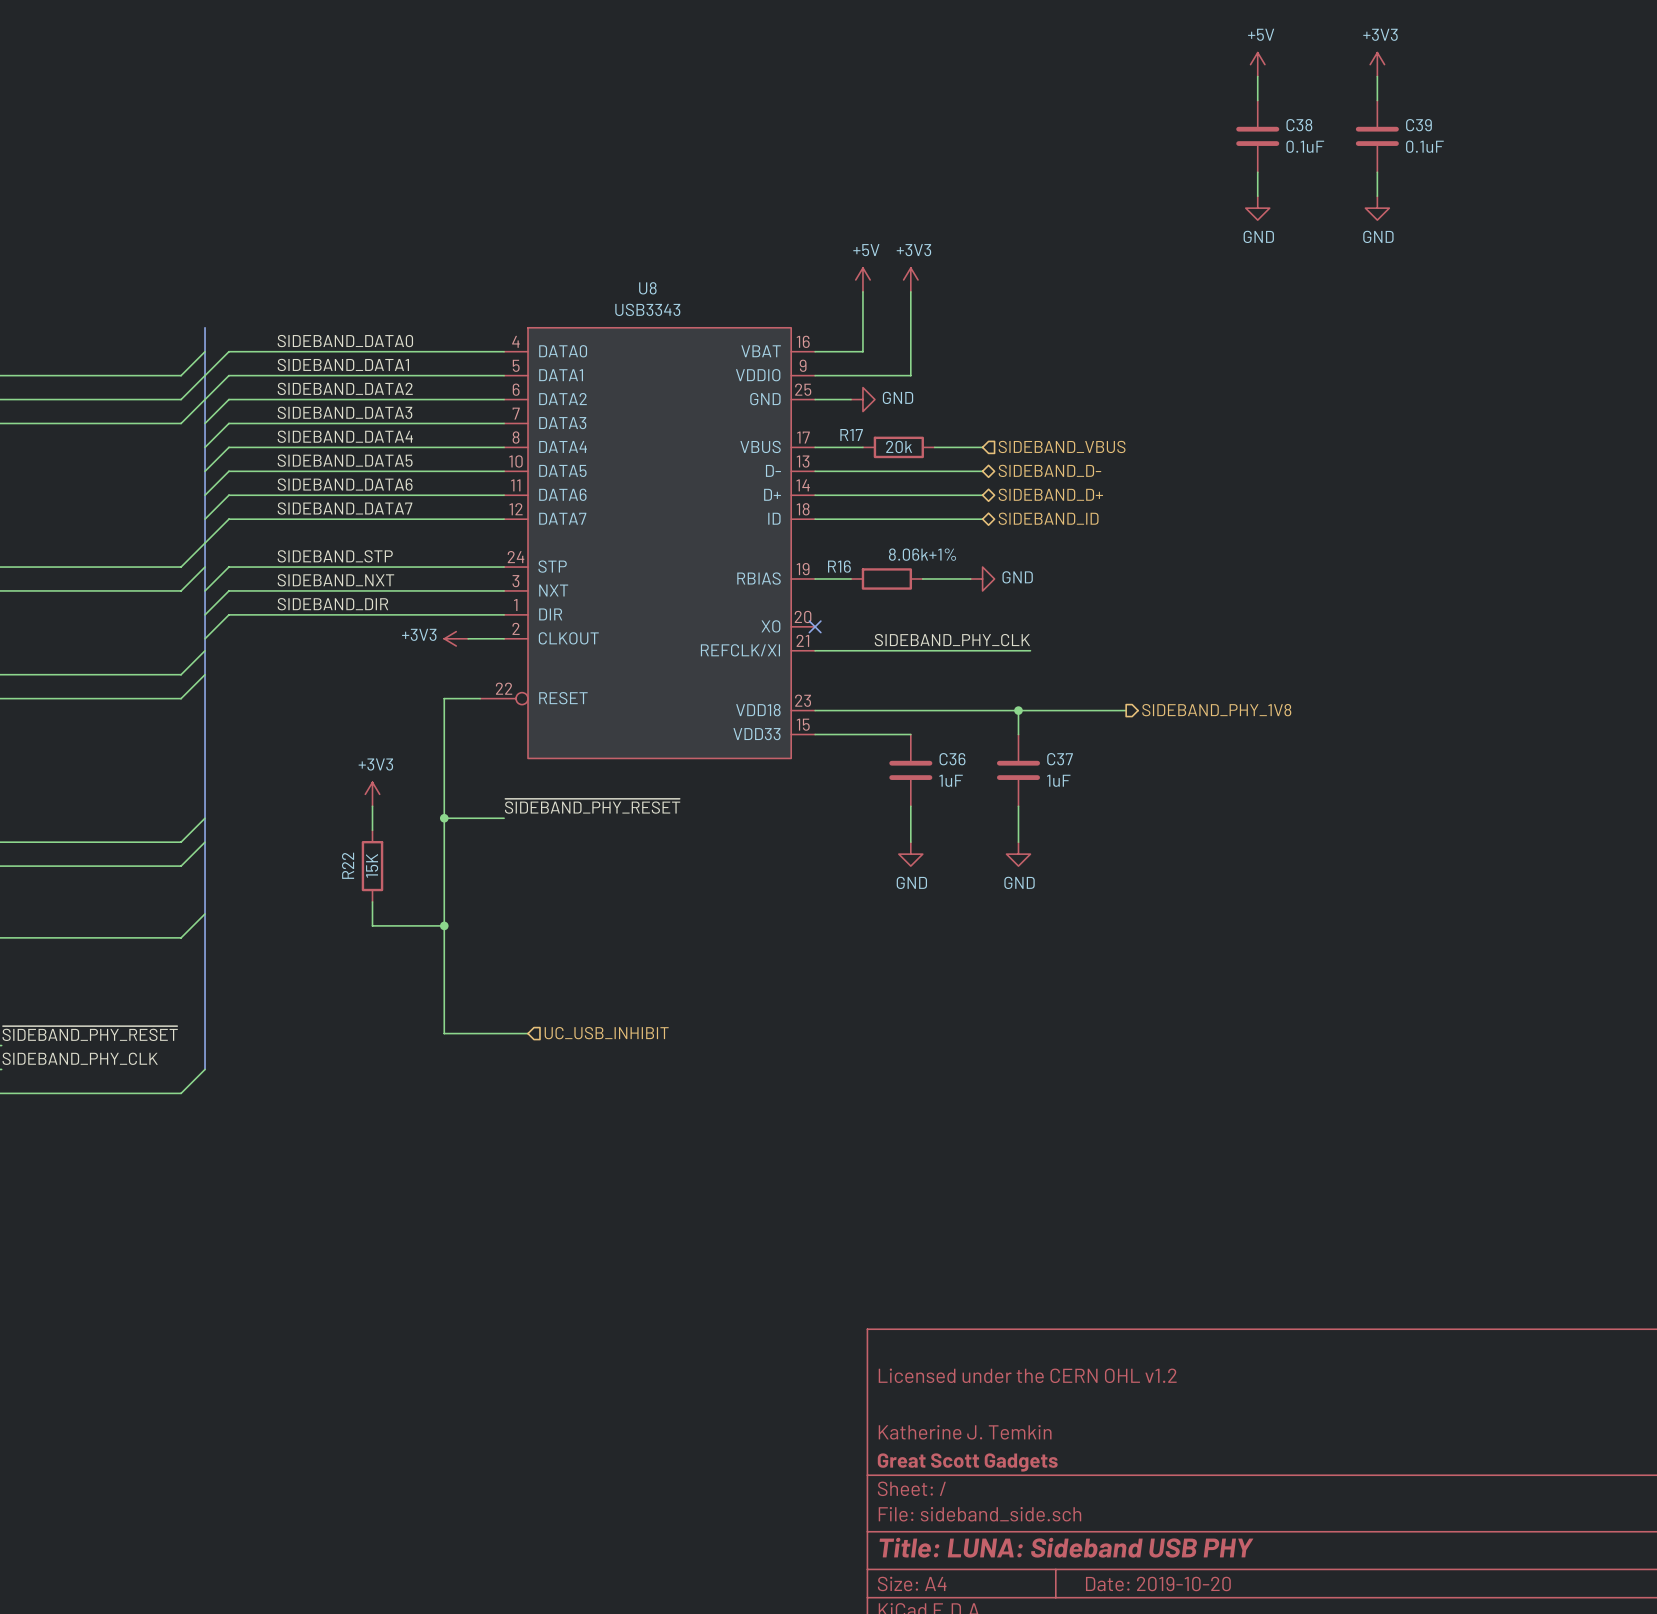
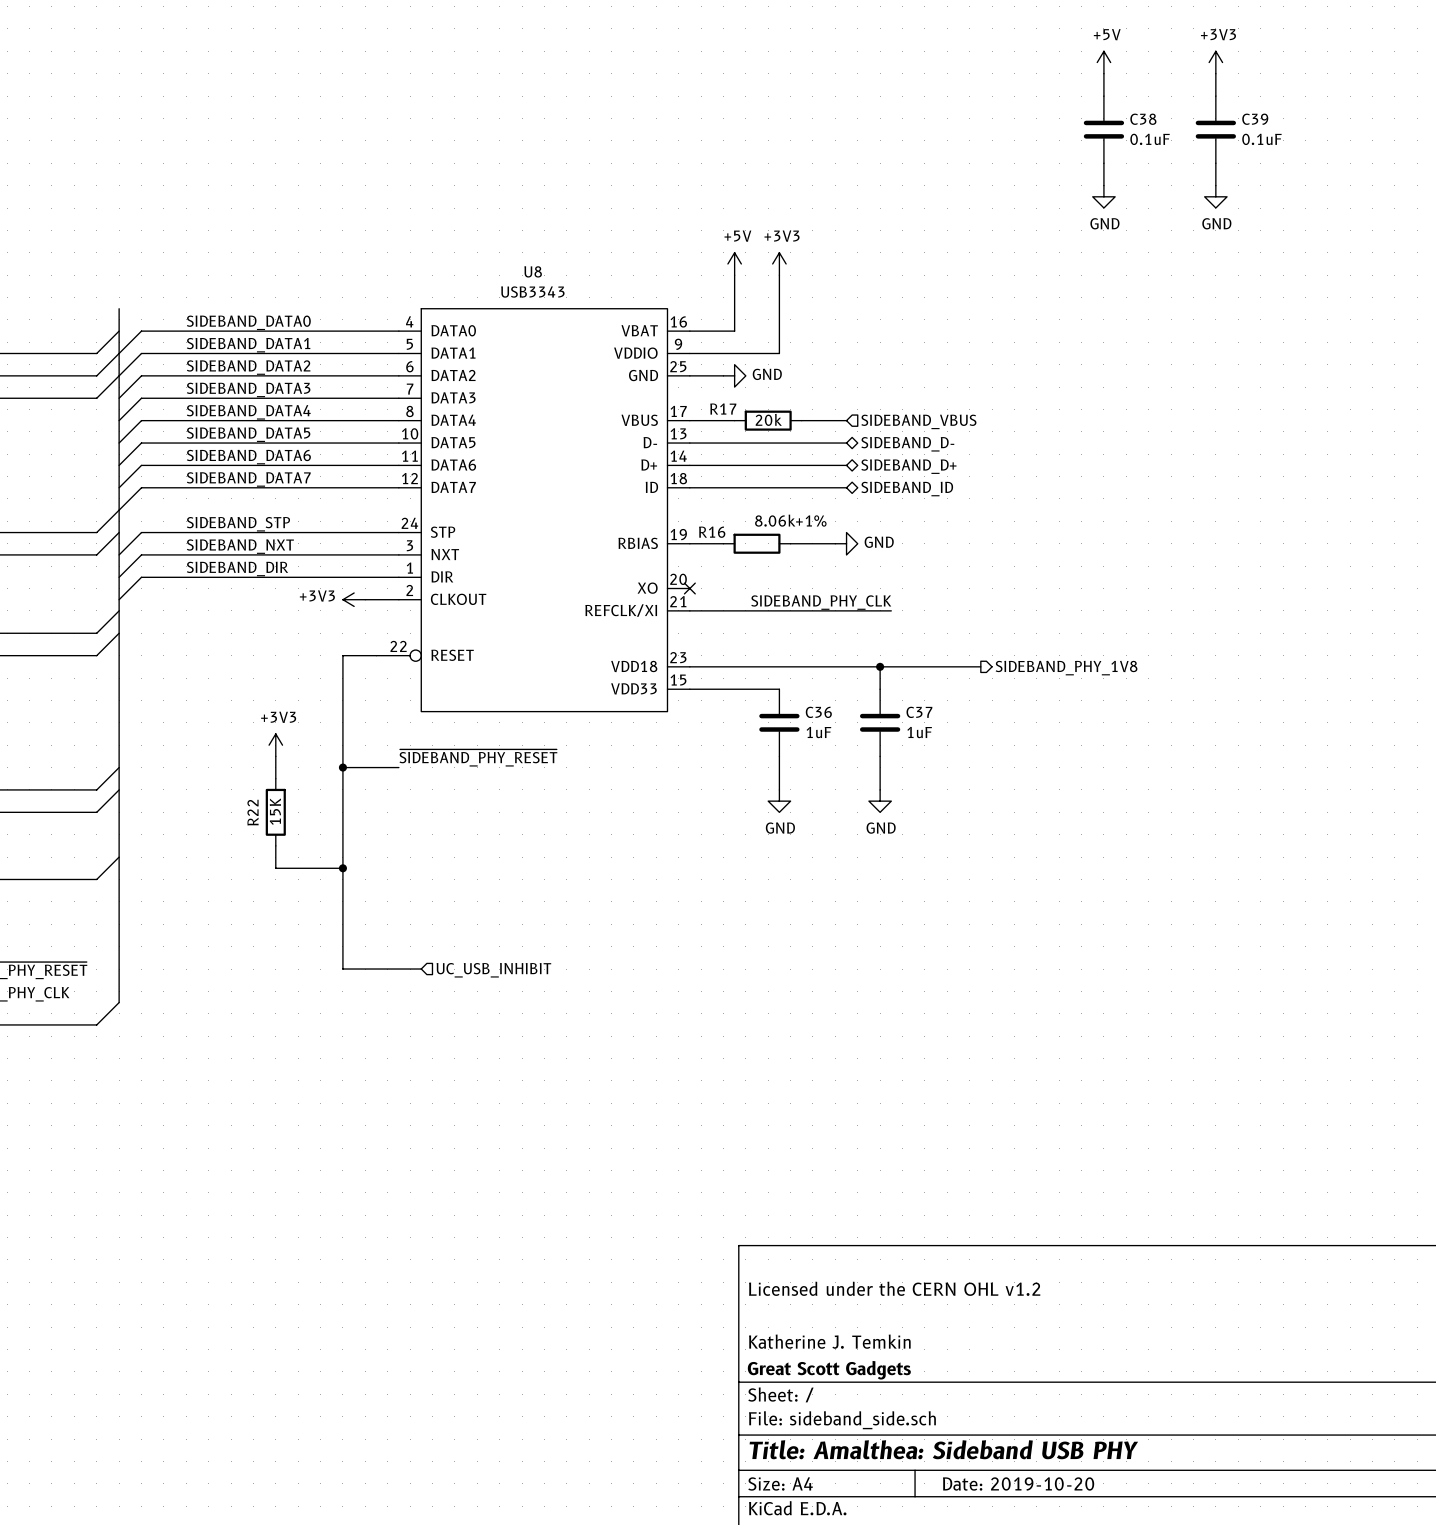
title block: Title: LUNA: Sideband USB PHY (1066, 1547) -> Title: Amalthea: Sideband USB PHY (943, 1449)

